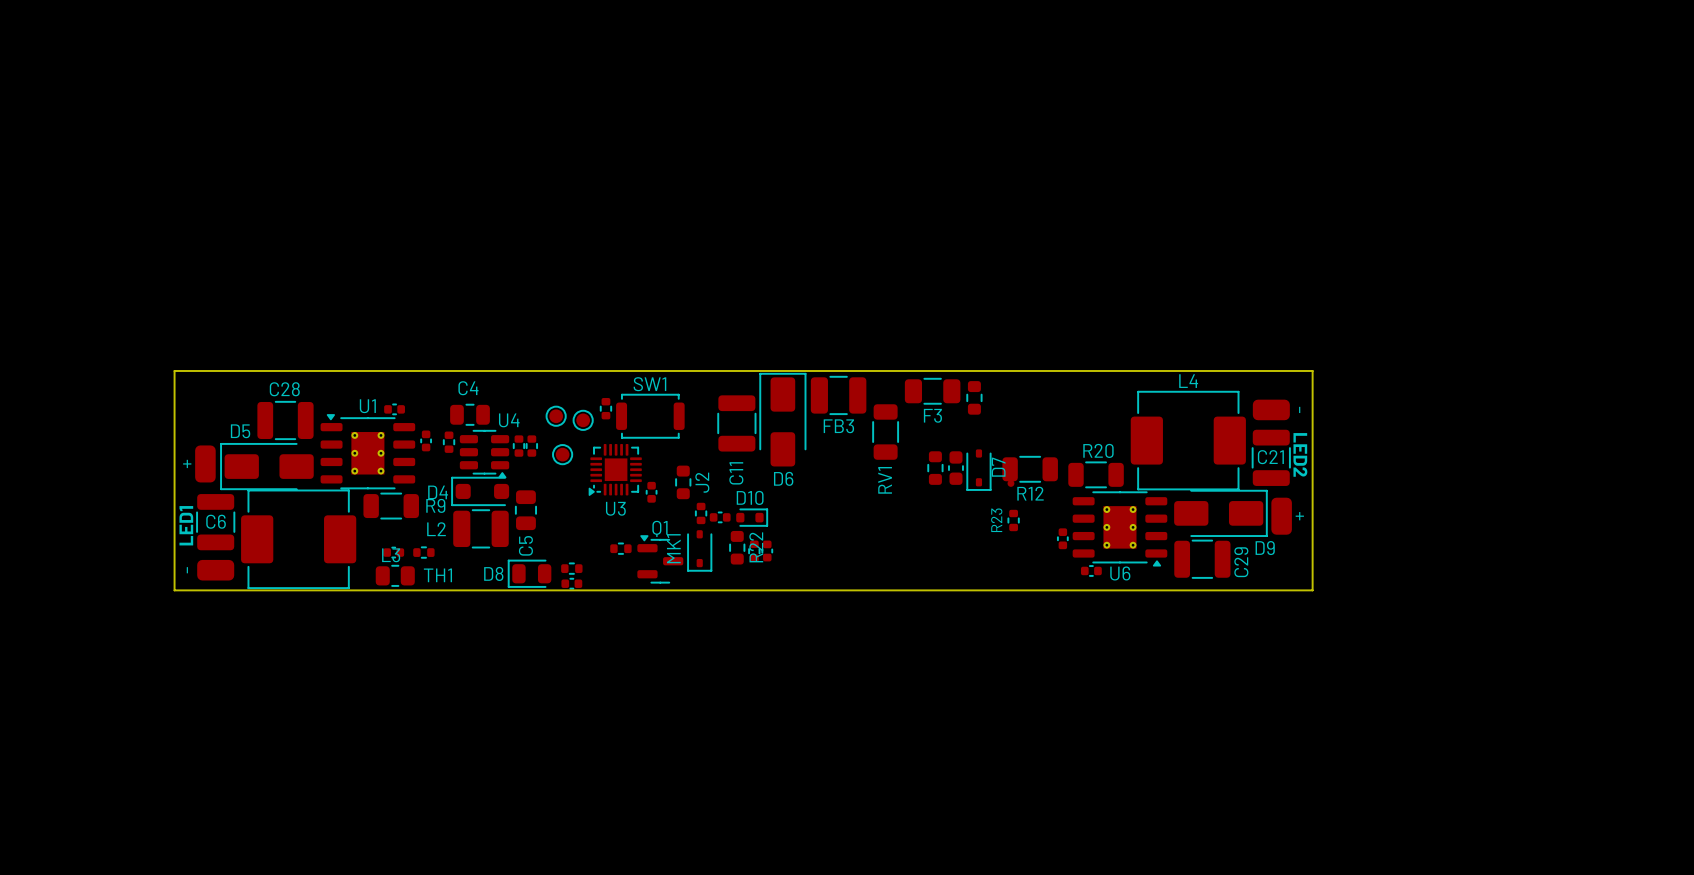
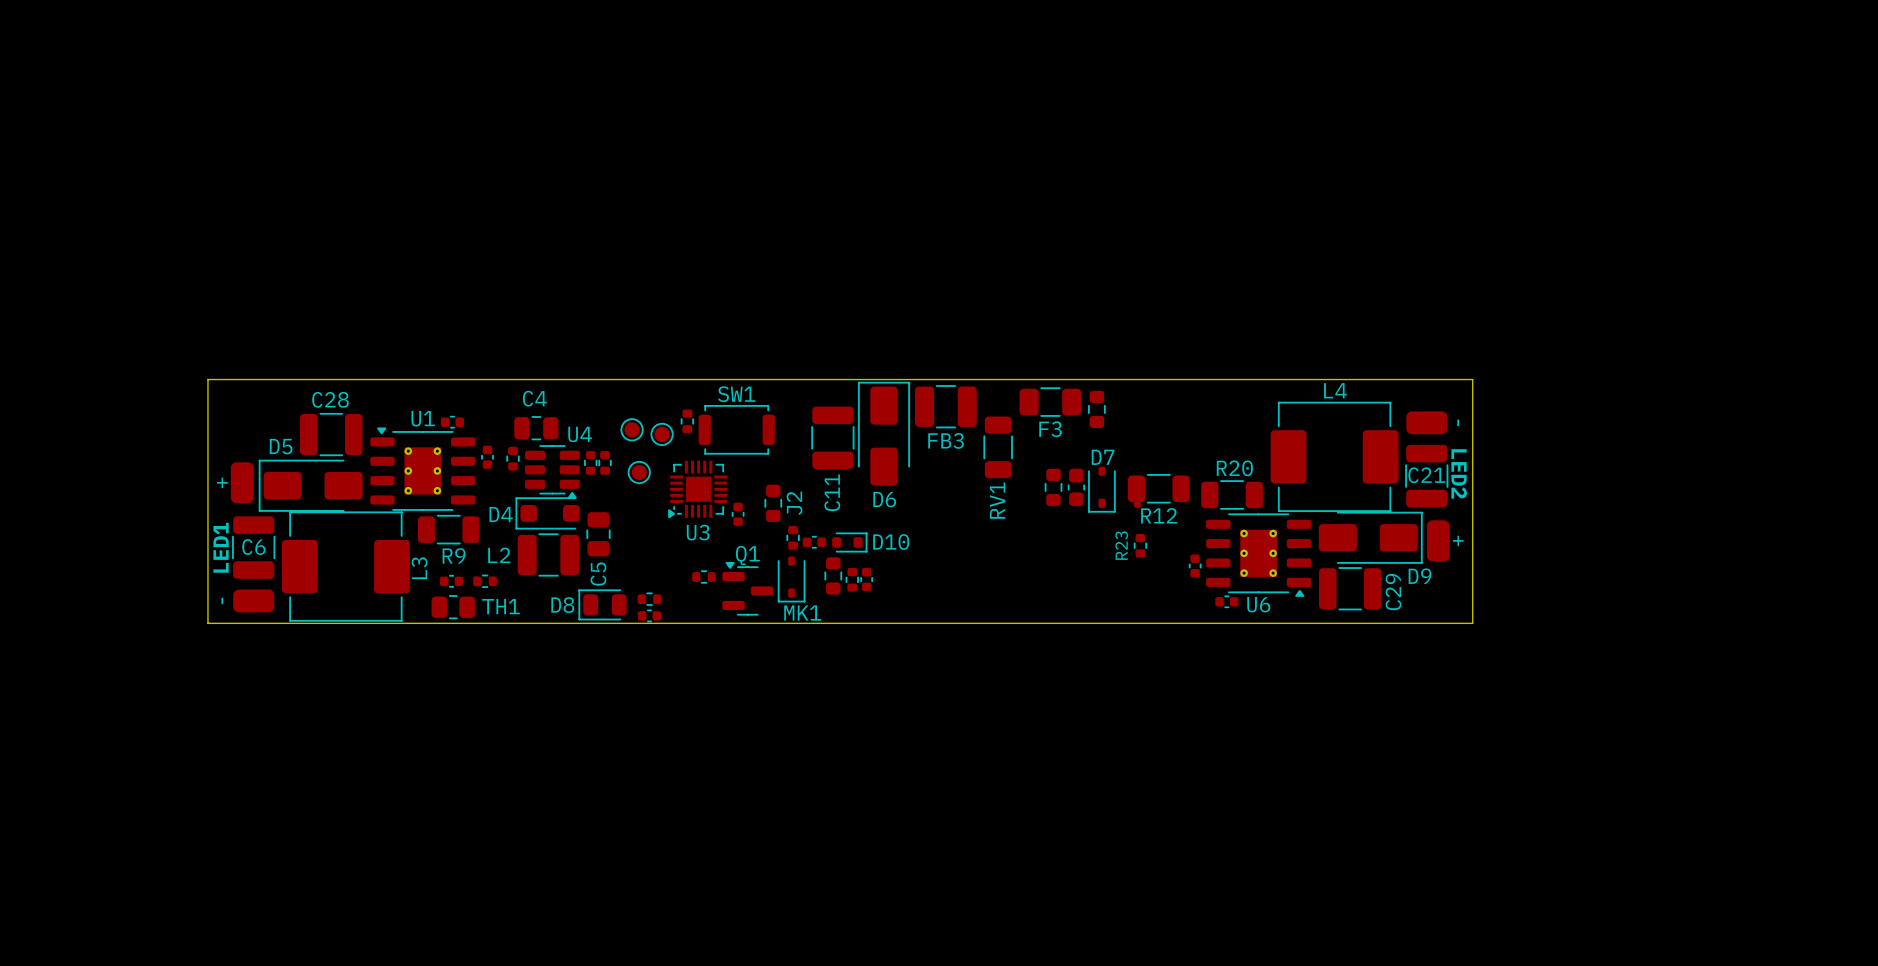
D7 name rotation: 0° (998, 467) -> 90° clockwise (1103, 457)
D10 name position: D10 (750, 497) -> D10 (891, 542)
R9 name position: R9 (435, 505) -> R9 (454, 555)
R22 name: R22 (756, 547) -> none
MK1 name rotation: 0° (673, 548) -> 90° clockwise (802, 613)
L3 name rotation: 0° (391, 555) -> 90° counterclockwise (419, 568)

